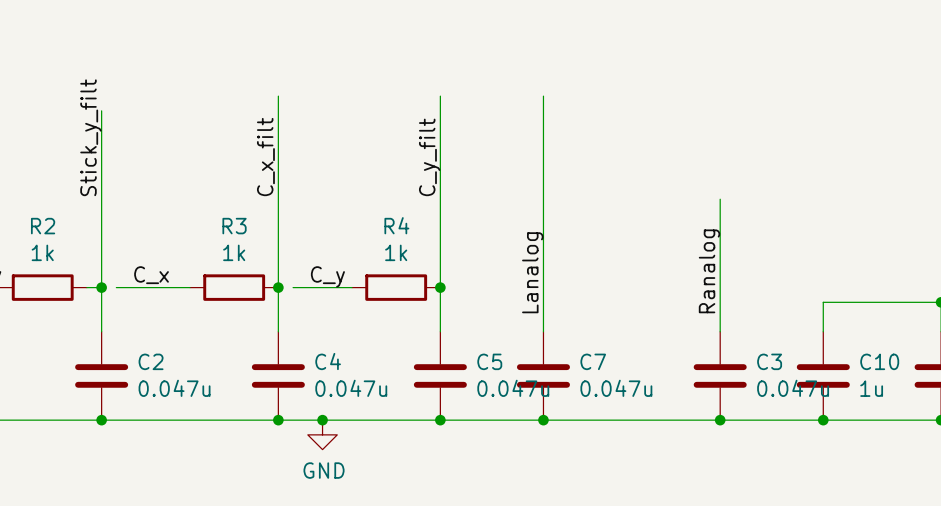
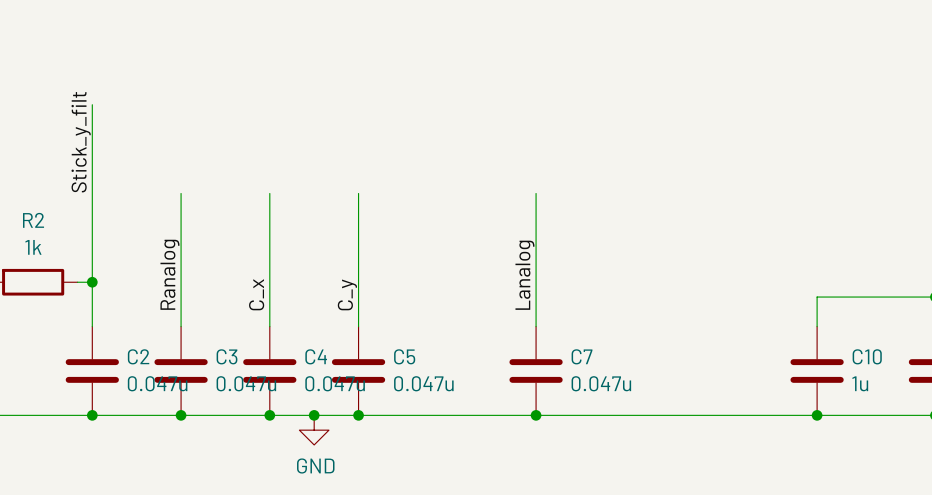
wire: (278, 96) (278, 199) -> none
wire: (440, 96) (440, 331) -> none
wire: (543, 96) (543, 199) -> none
label: C_x_filt (265, 157) -> none
label: C_y_filt (429, 157) -> none
wire: none -> (181, 193) (181, 326)
wire: none -> (358, 193) (358, 326)
wire: (720, 199) (720, 331) -> none
label: none -> Ranalog (169, 274)
label: Ranalog (709, 271) -> none
label rotation: 0° (151, 275) -> 90° counterclockwise (256, 294)
label position: C_x (151, 275) -> C_x (256, 294)
label rotation: 0° (327, 276) -> 90° counterclockwise (347, 294)
wire: (116, 287) (189, 287) -> none
R3: 1k (234, 287) -> none
junction: (278, 287) -> none
wire: (293, 287) (352, 287) -> none
R4: 1k (396, 287) -> none
junction: (440, 287) -> none
C5 position: (440, 375) -> (358, 370)
C3 position: (720, 375) -> (181, 370)
junction: none -> (181, 415)
junction: none -> (358, 415)
junction: (440, 420) -> none
junction: (720, 420) -> none

